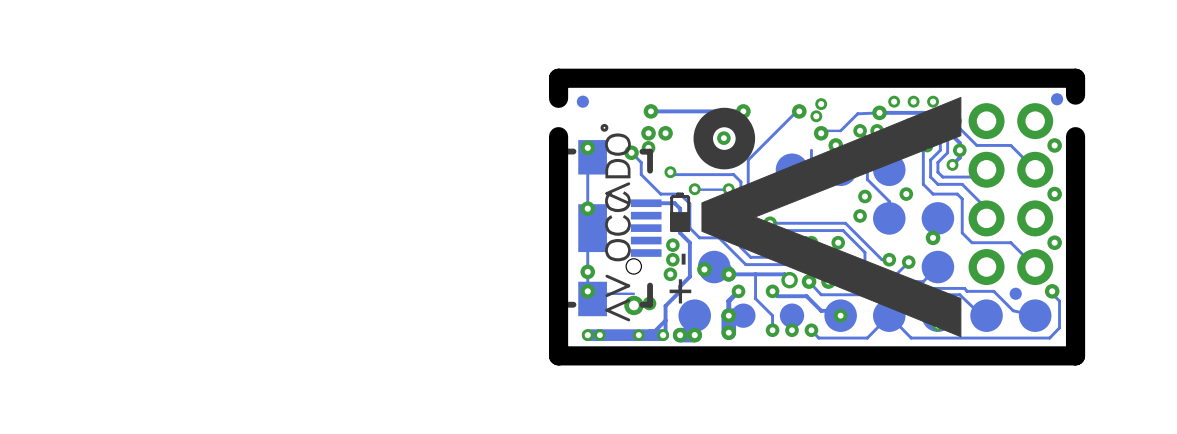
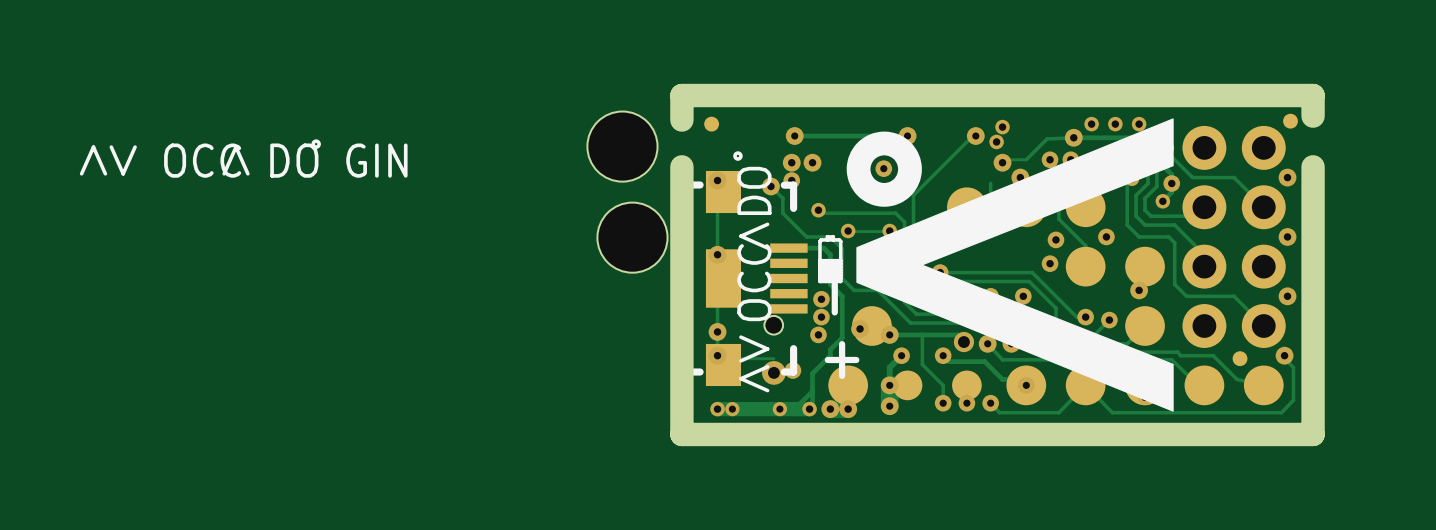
drawing: none -> [311, 139, 321, 149]
line: none -> (135, 147) (123, 173) (111, 147)
hole: none -> (622, 146)
text: none -> OCC DO GIN (285, 160)
line: none -> (105, 173) (93, 147) (81, 173)
line: none -> (247, 173) (236, 147) (224, 173)
hole: none -> (632, 237)

